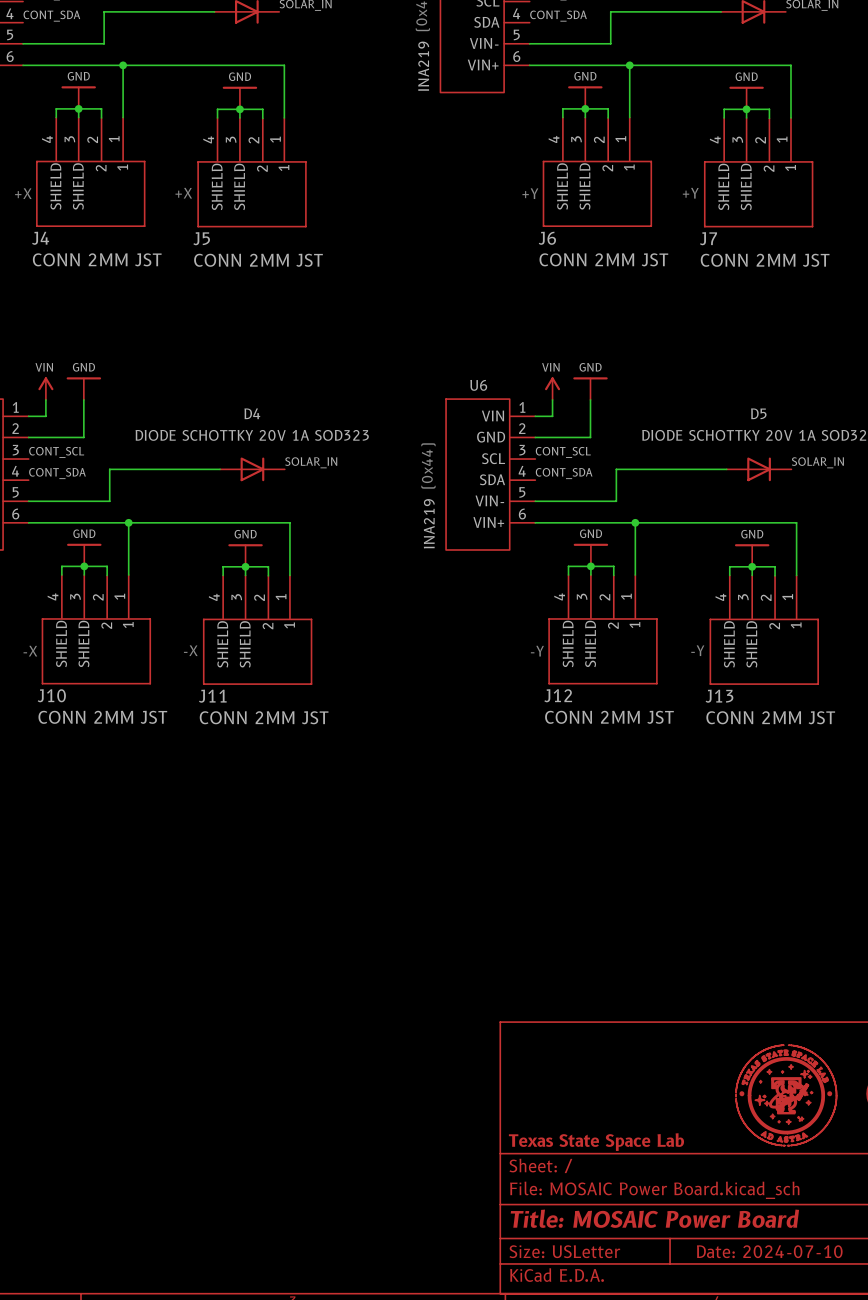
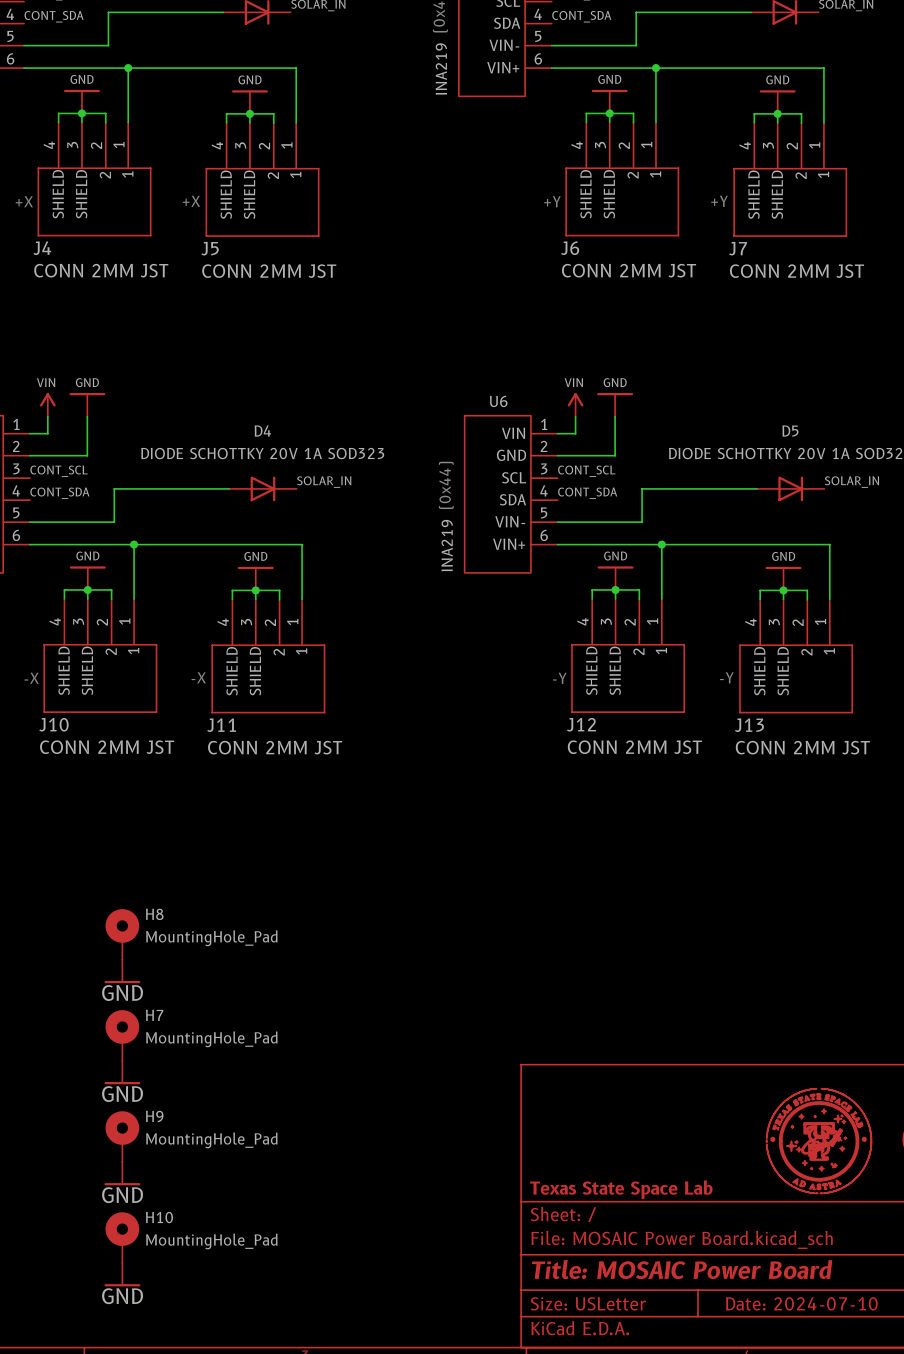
H8: none -> MountingHole_Pad (122, 934)
power symbol: none -> GND (122, 971)
H7: none -> MountingHole_Pad (122, 1035)
power symbol: none -> GND (122, 1072)
H9: none -> MountingHole_Pad (122, 1136)
power symbol: none -> GND (122, 1173)
H10: none -> MountingHole_Pad (122, 1237)
power symbol: none -> GND (122, 1274)

